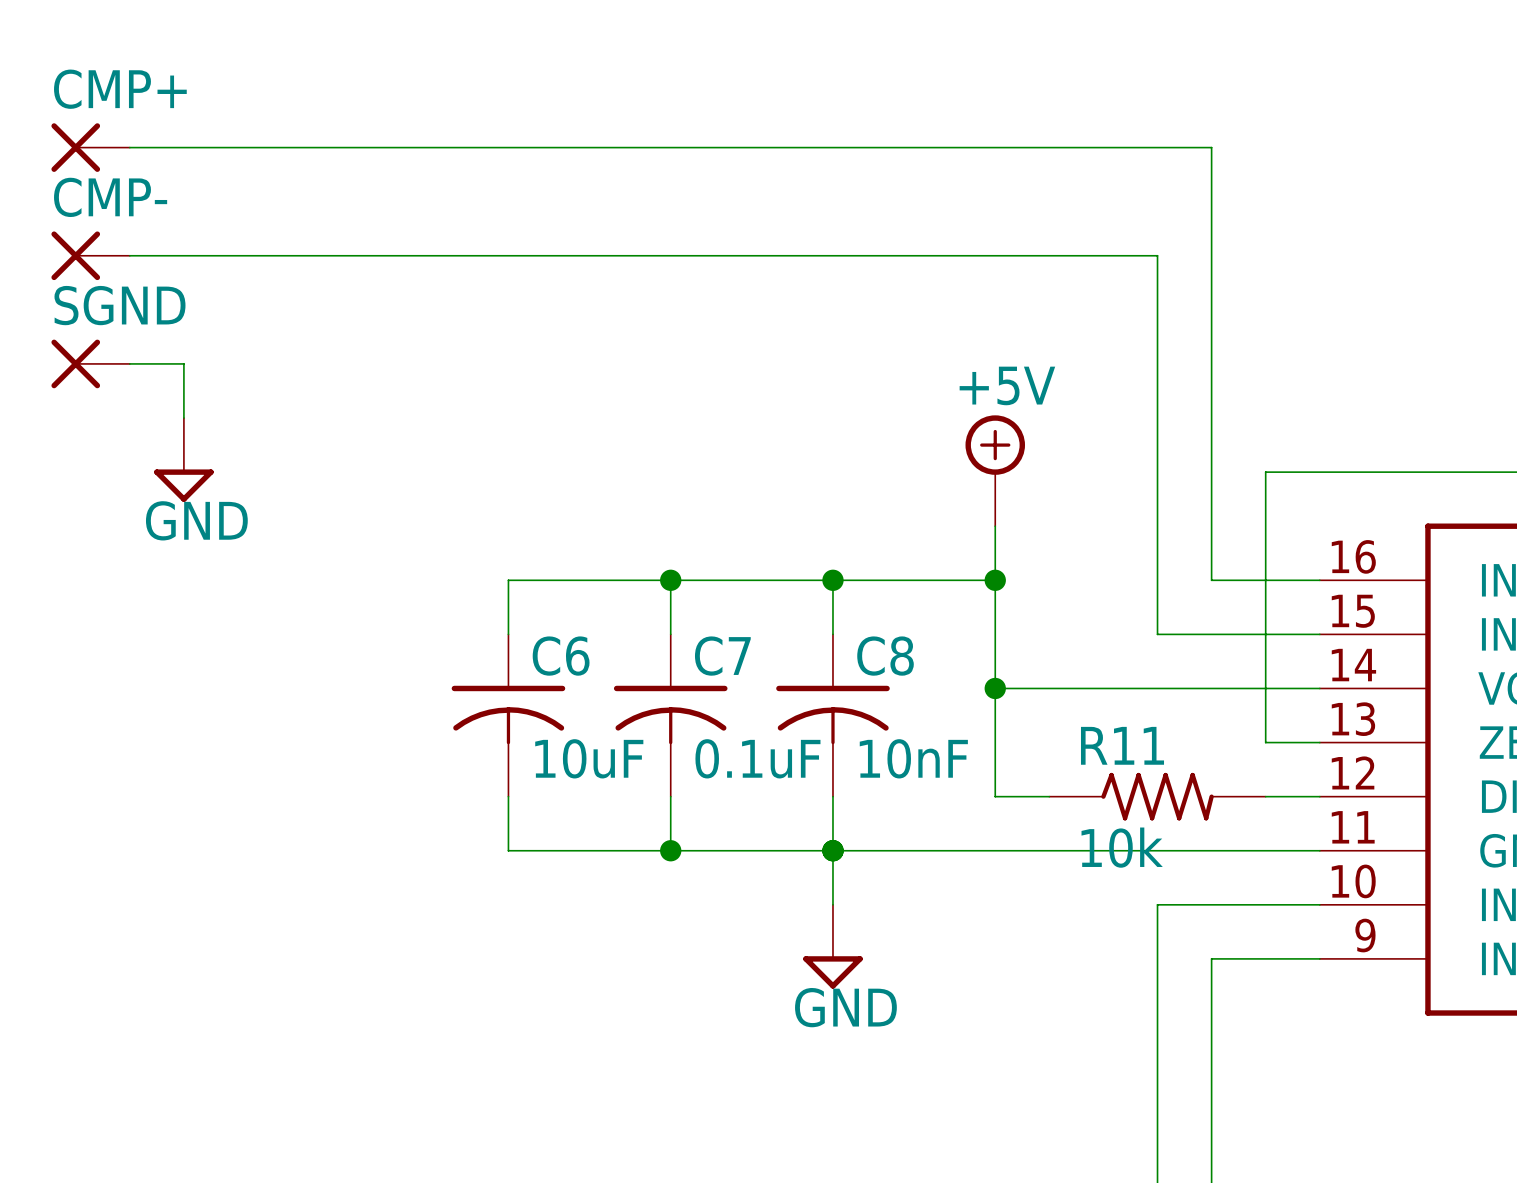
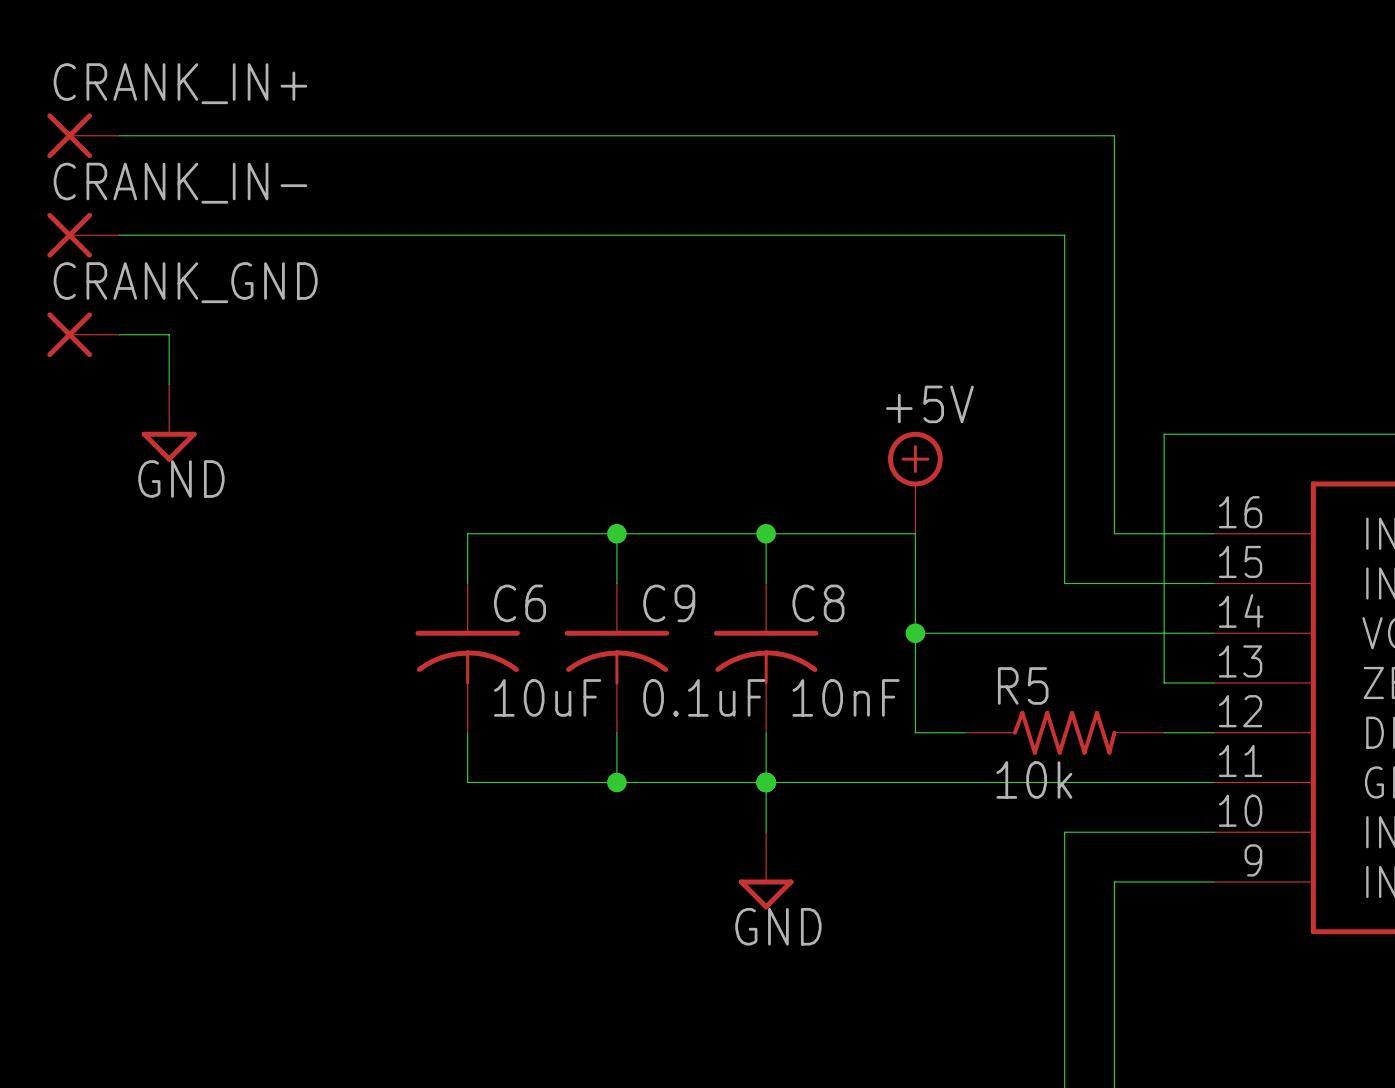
CMP+ name: CMP+ (120, 89) -> CRANK_IN+ (180, 83)
CMP- name: CMP- (110, 197) -> CRANK_IN- (180, 183)
SGND name: SGND (119, 305) -> CRANK_GND (185, 282)
power symbol position: +5V (995, 470) -> +5V (915, 482)
junction: (995, 580) -> none
C7 name: C7 (722, 656) -> C9 (669, 603)
R11 name: R11 (1122, 745) -> R5 (1023, 685)

